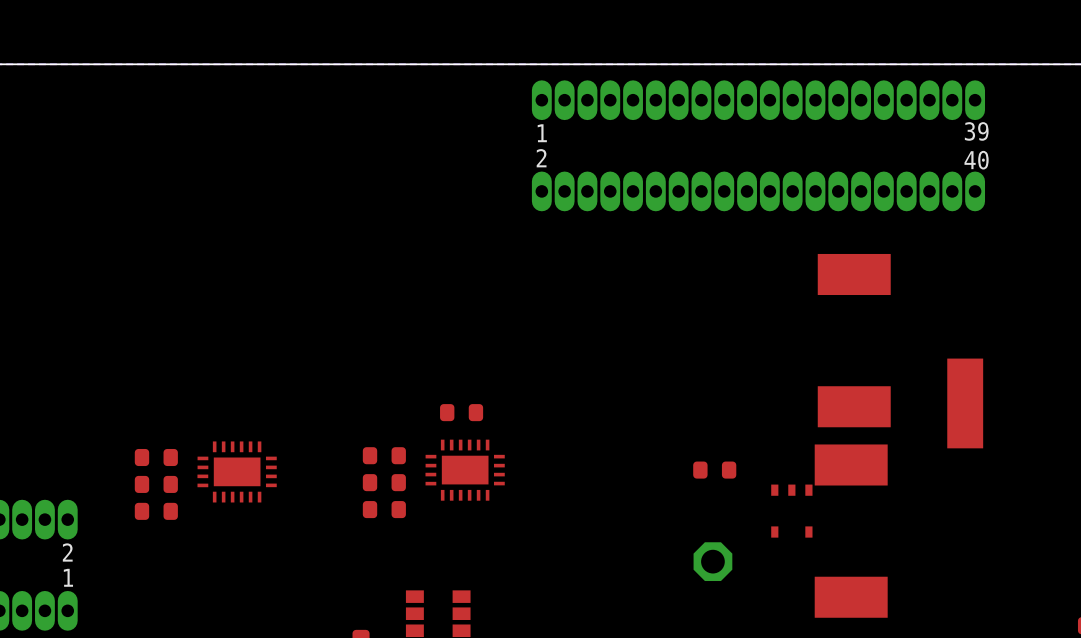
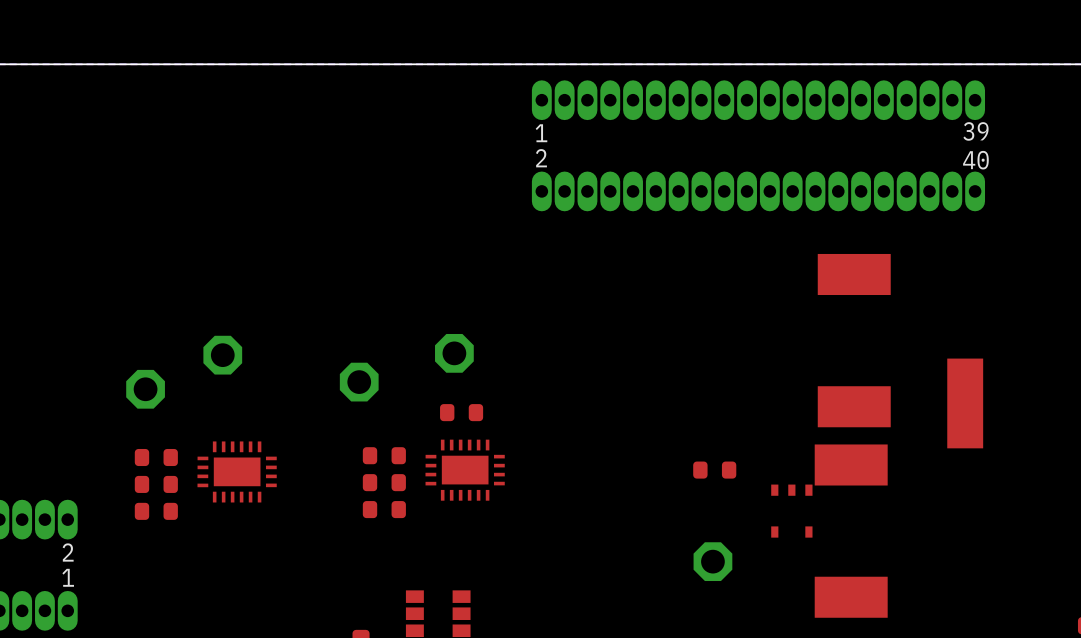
part: none -> (454, 353)
part: none -> (222, 355)
part: none -> (359, 382)
part: none -> (145, 389)

